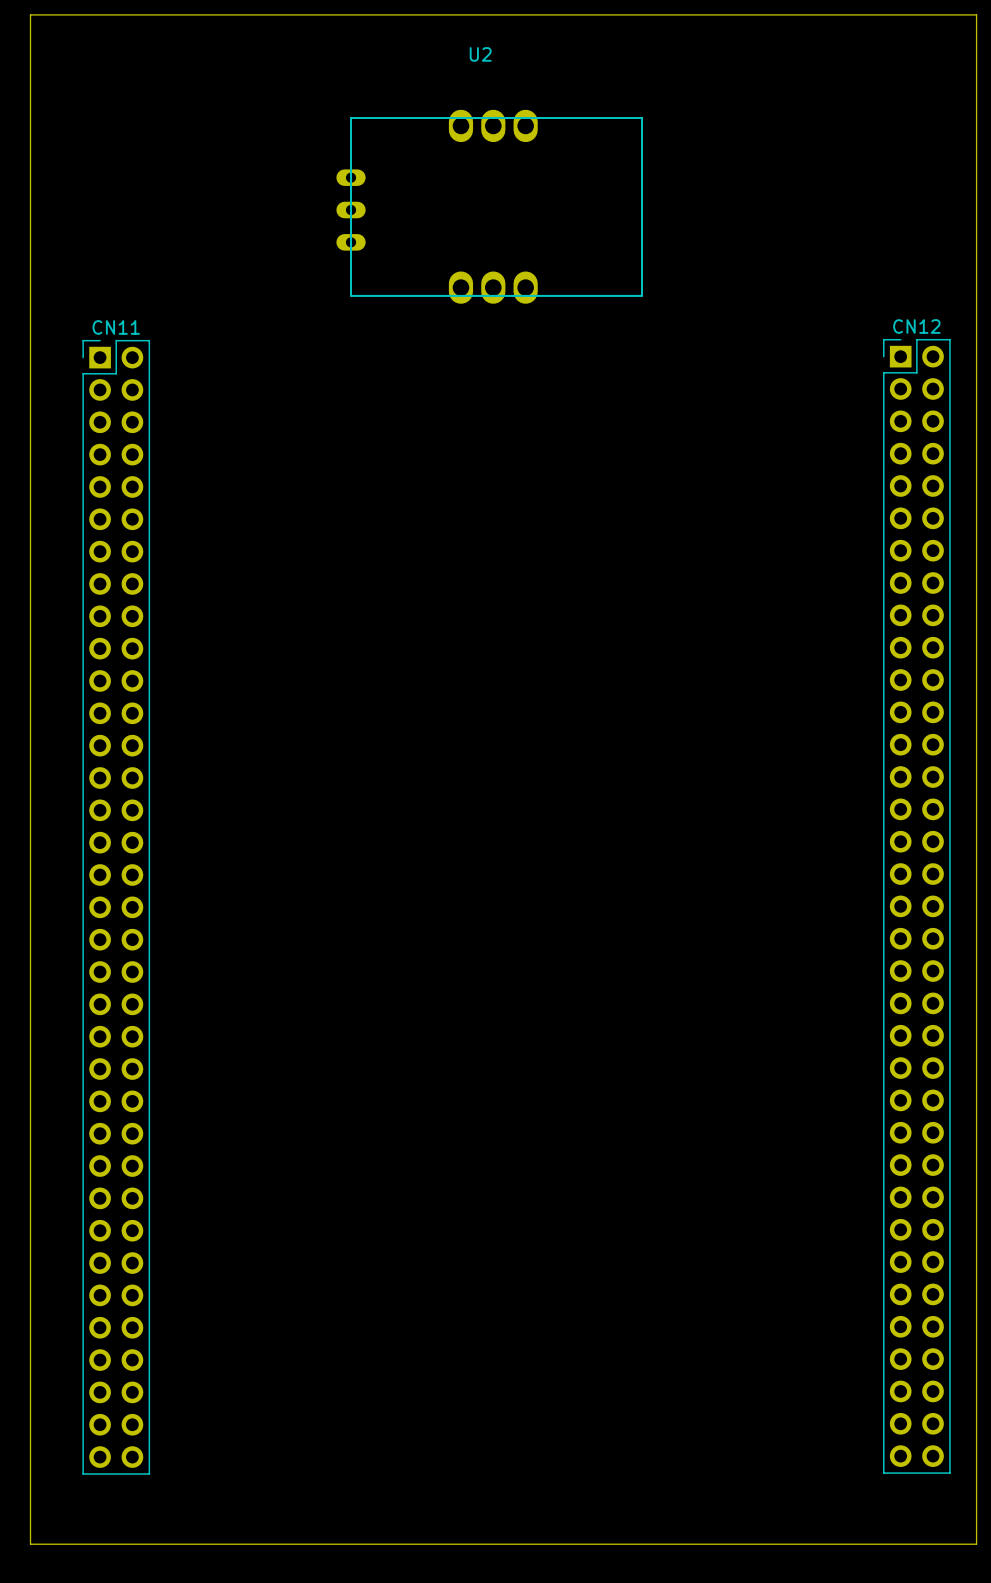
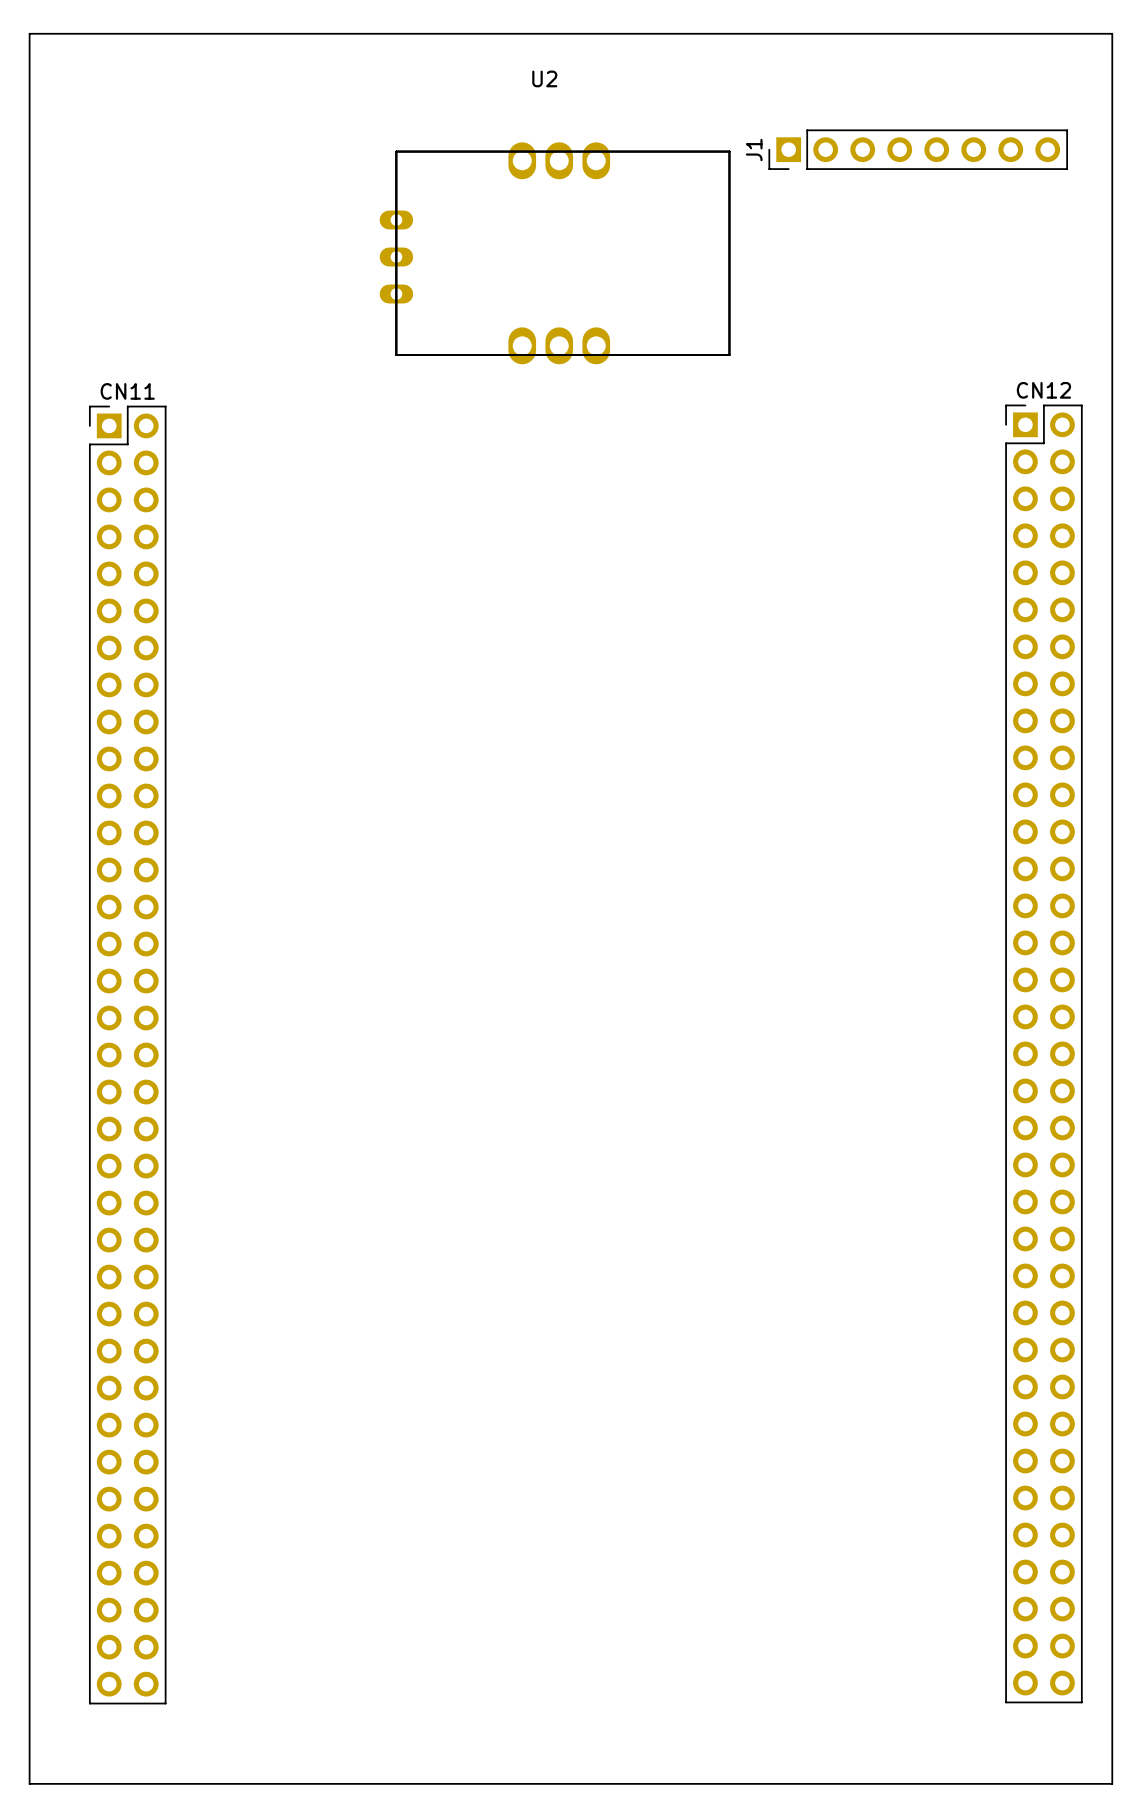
J1: none -> (918, 149)

